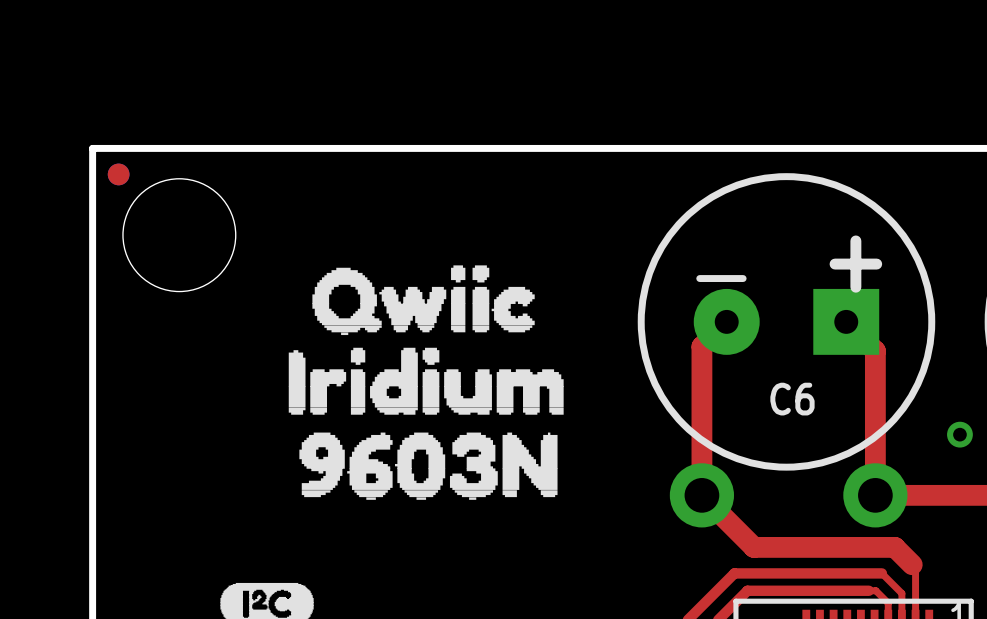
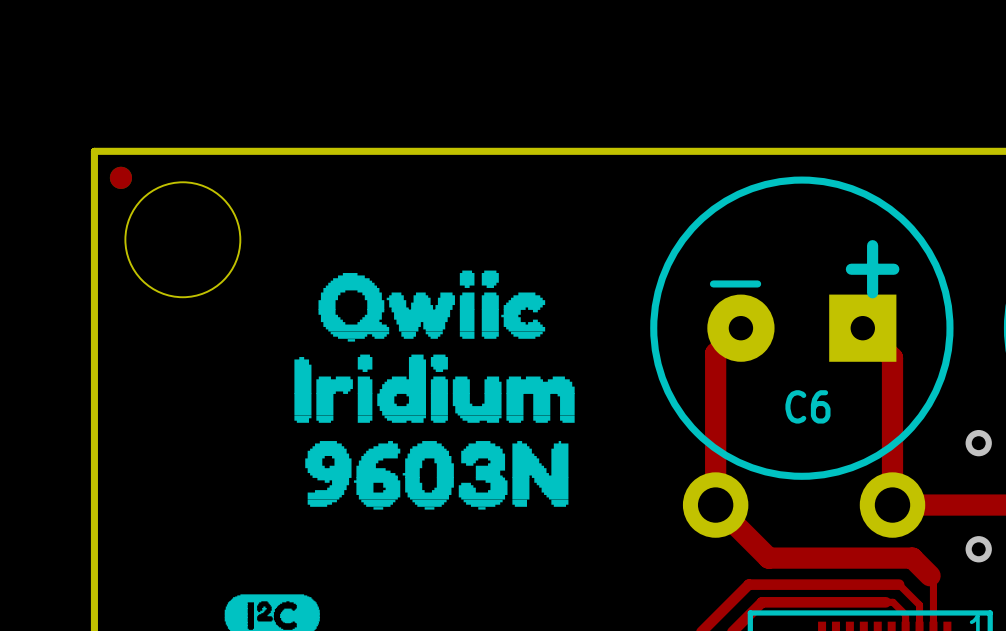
via: none -> (978, 549)

